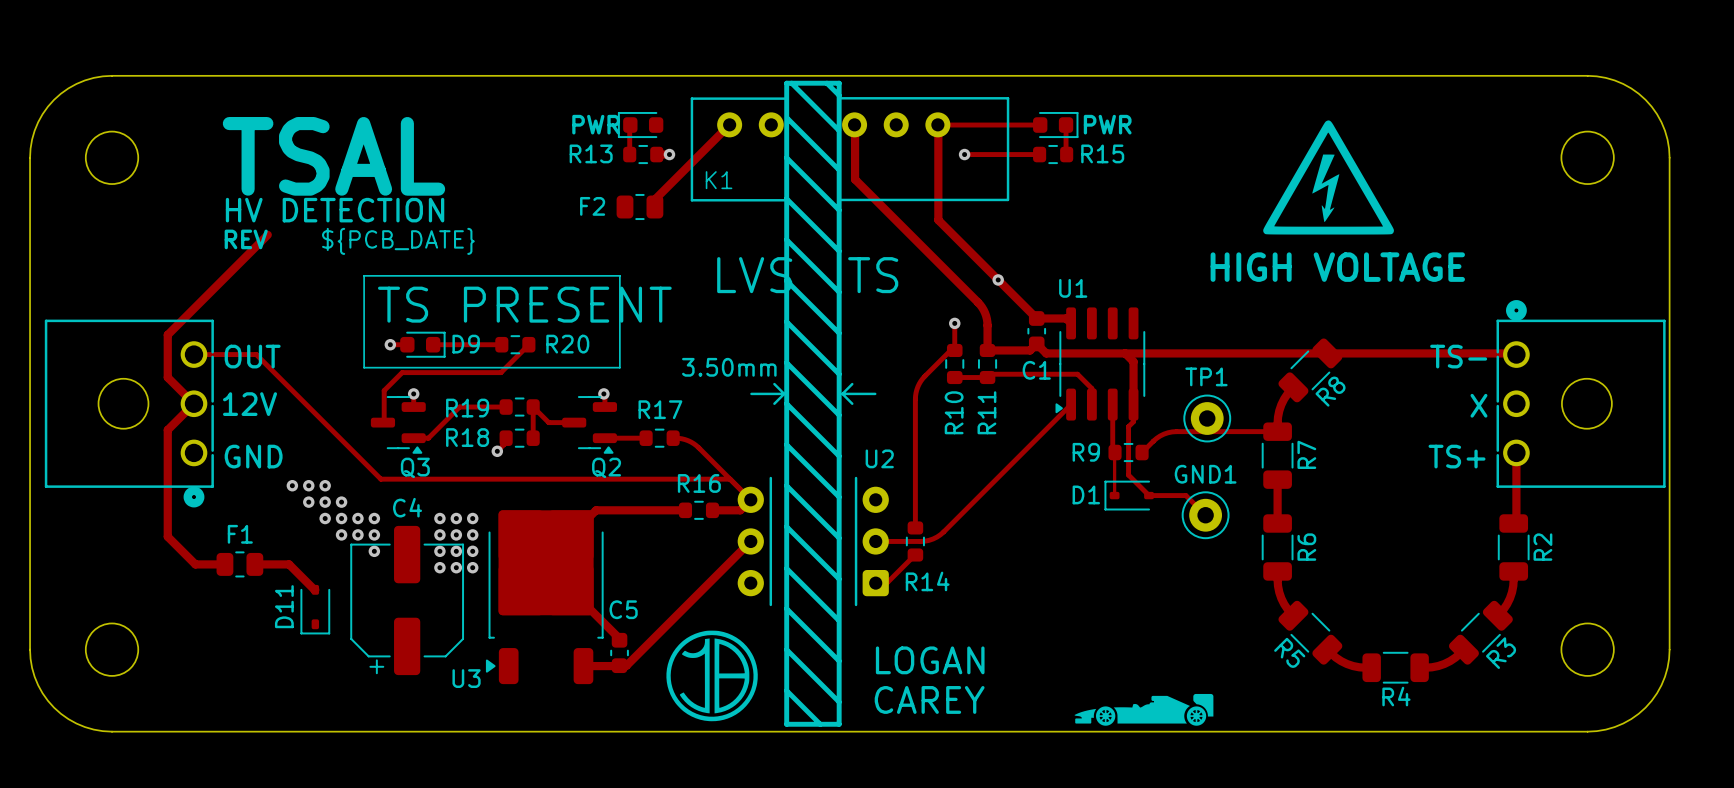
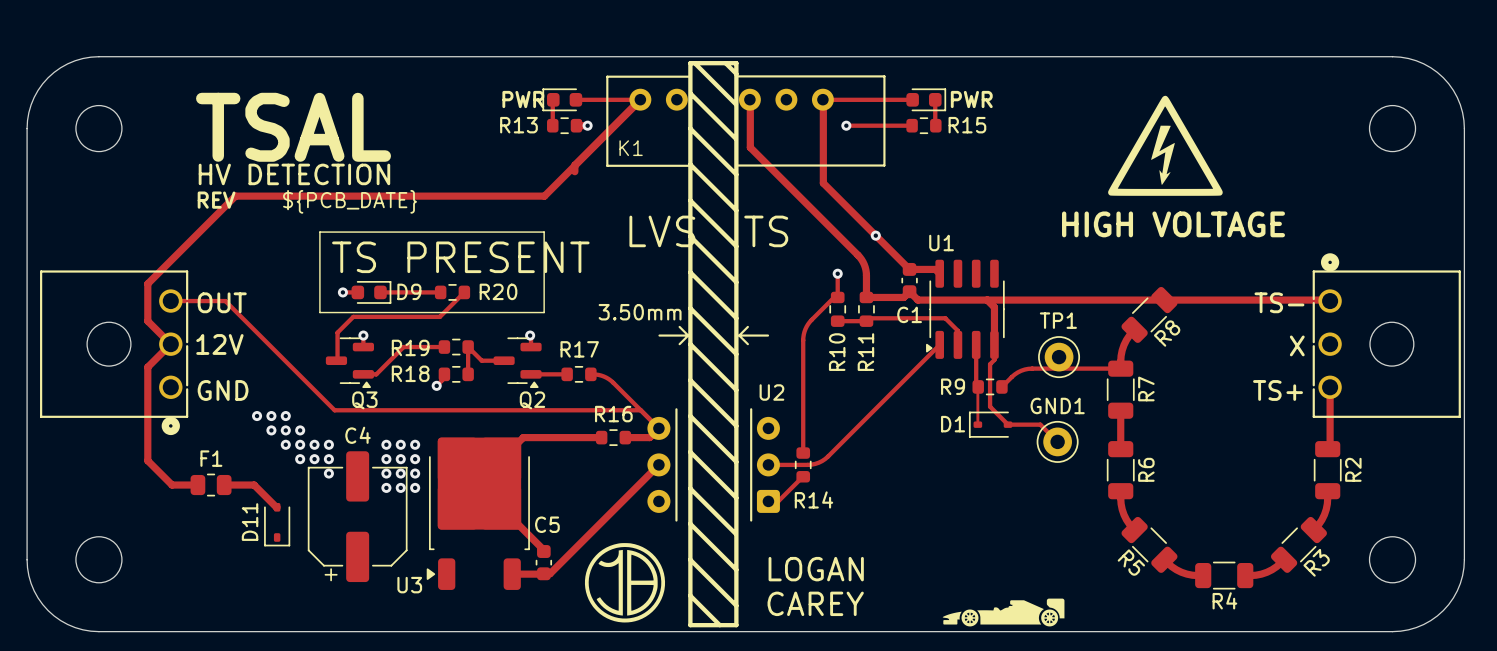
track: none -> (575, 99) (640, 99) (544, 196) (235, 196)
F2: (639, 207) -> none

